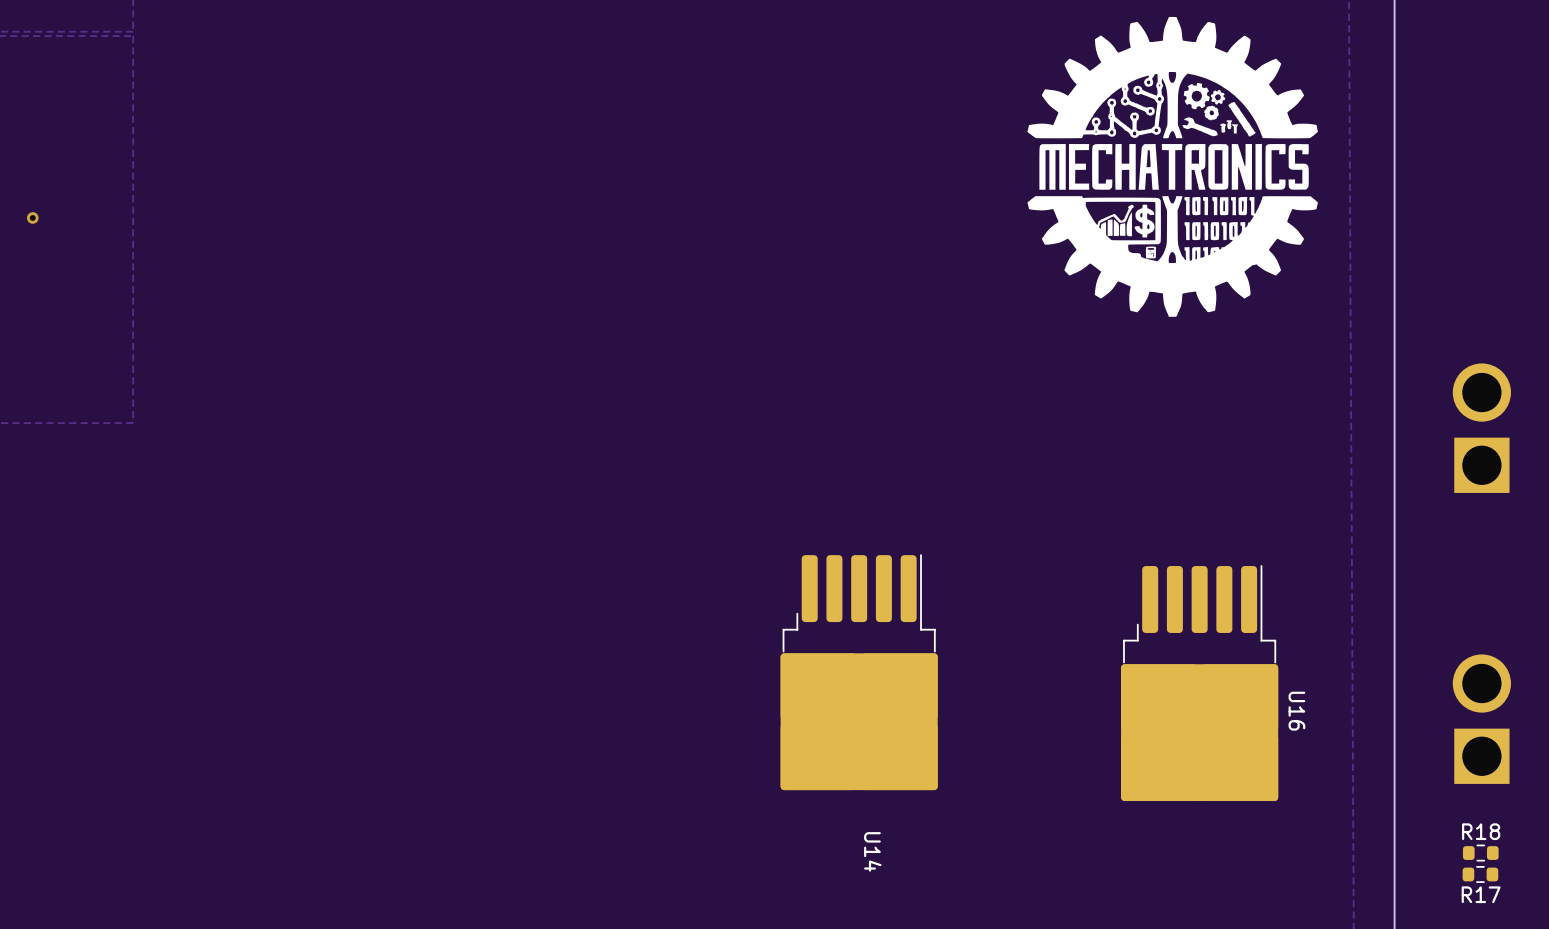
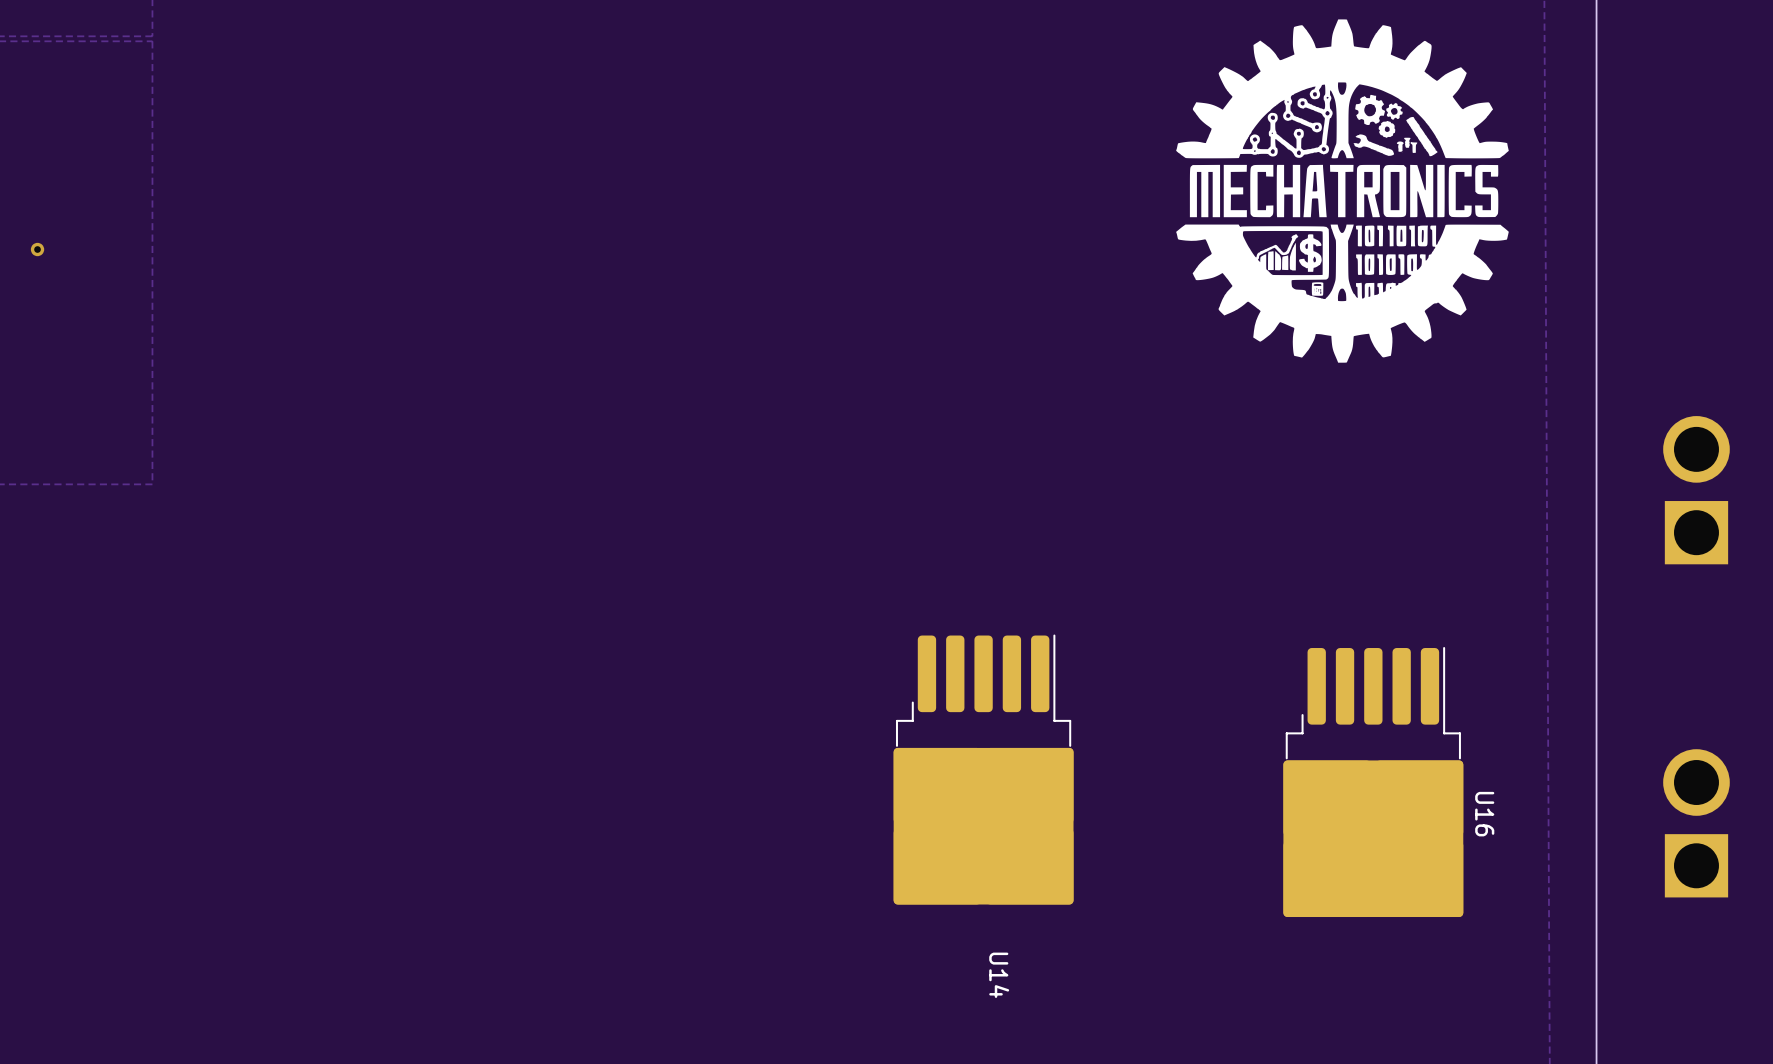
R18: (1480, 853) -> none
R17: (1480, 874) -> none

